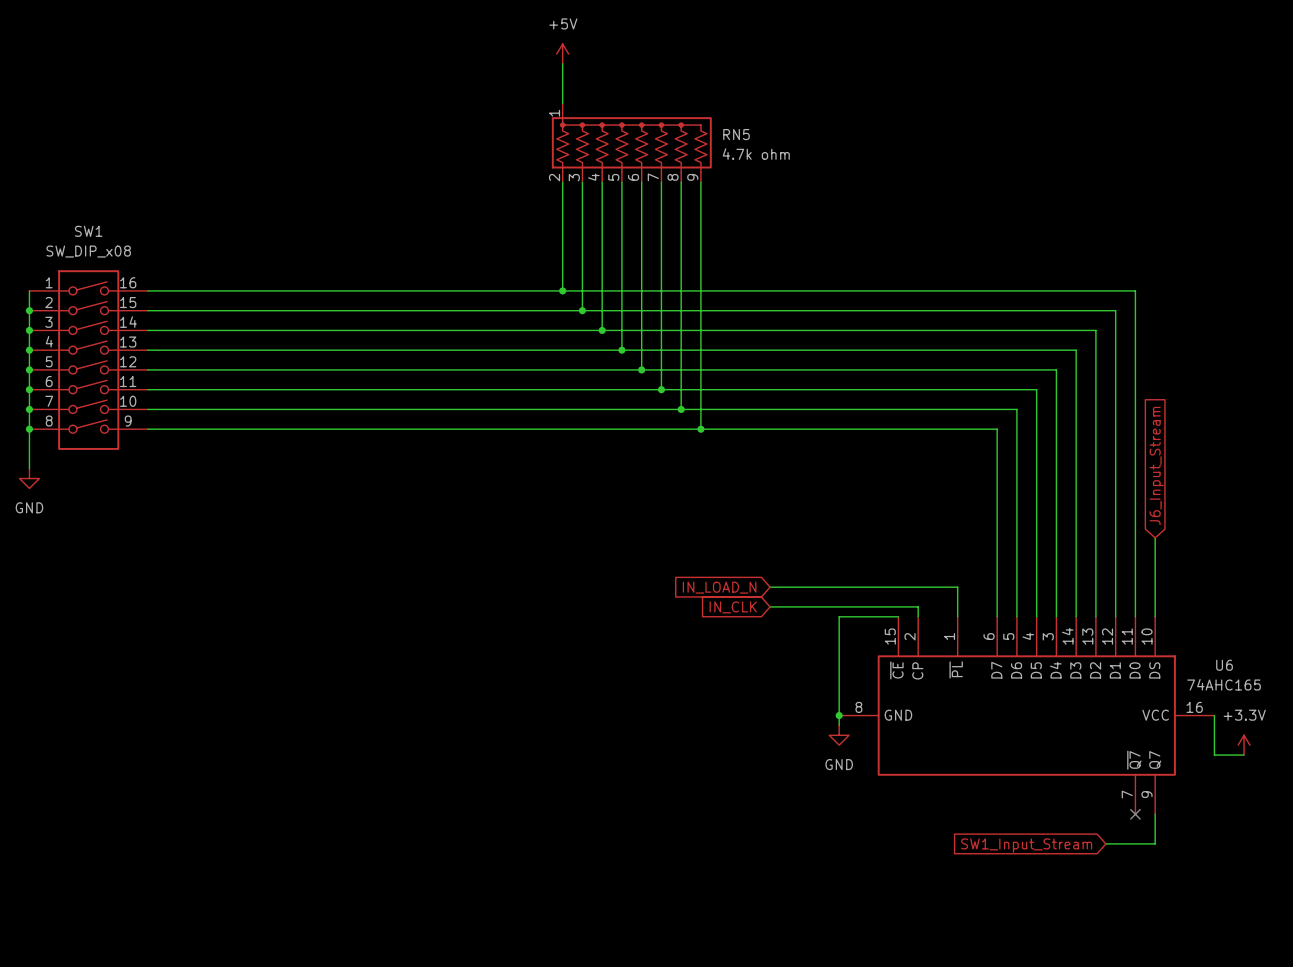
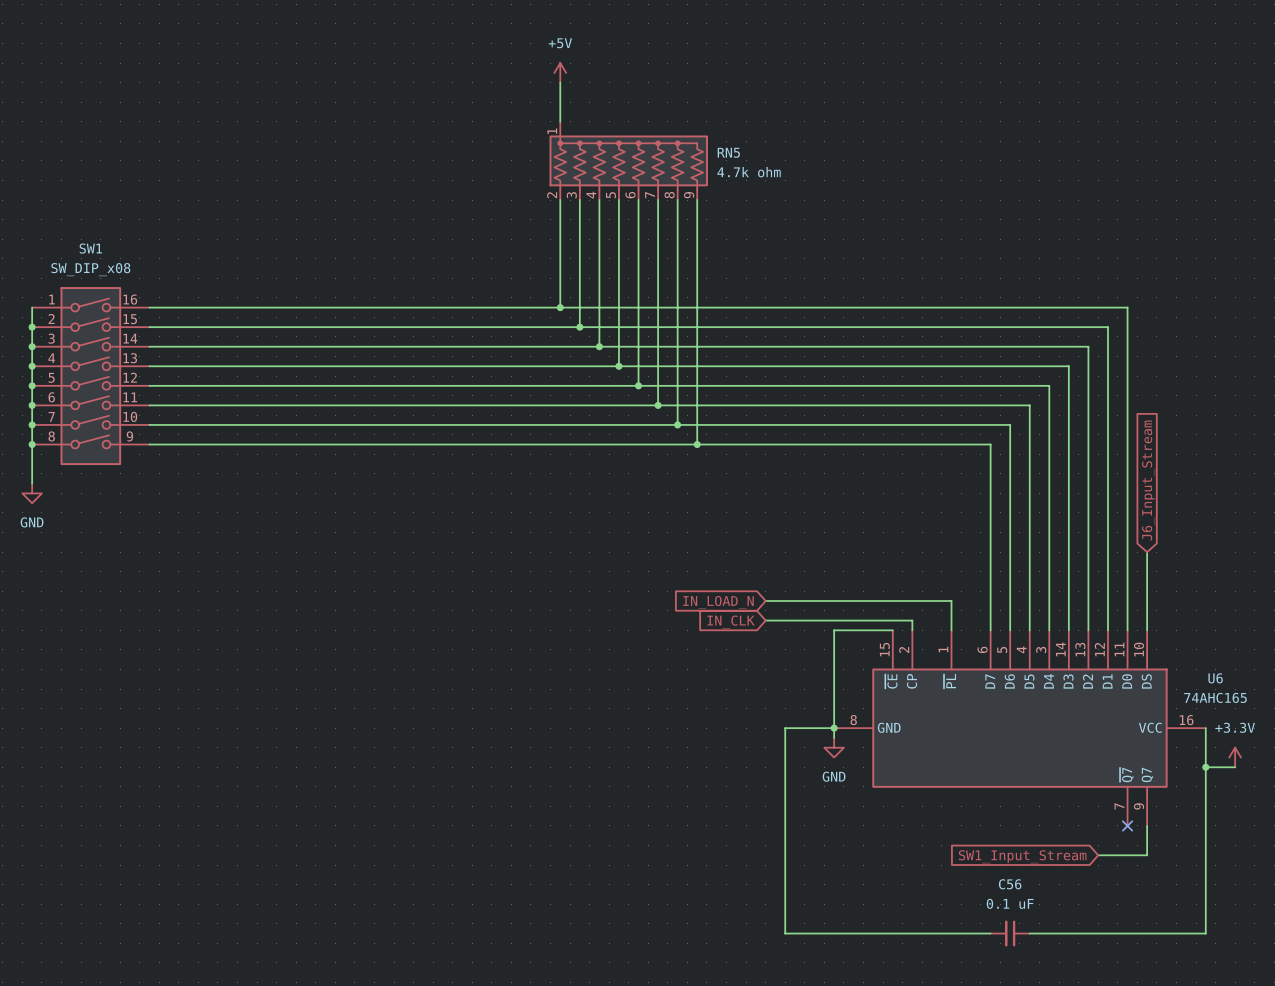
wire: none -> (834, 728) (785, 728) (785, 933) (990, 933)
wire: none -> (1205, 767) (1205, 933) (1029, 933)
junction: none -> (1205, 767)
C56: none -> 0.1 uF (1010, 933)

